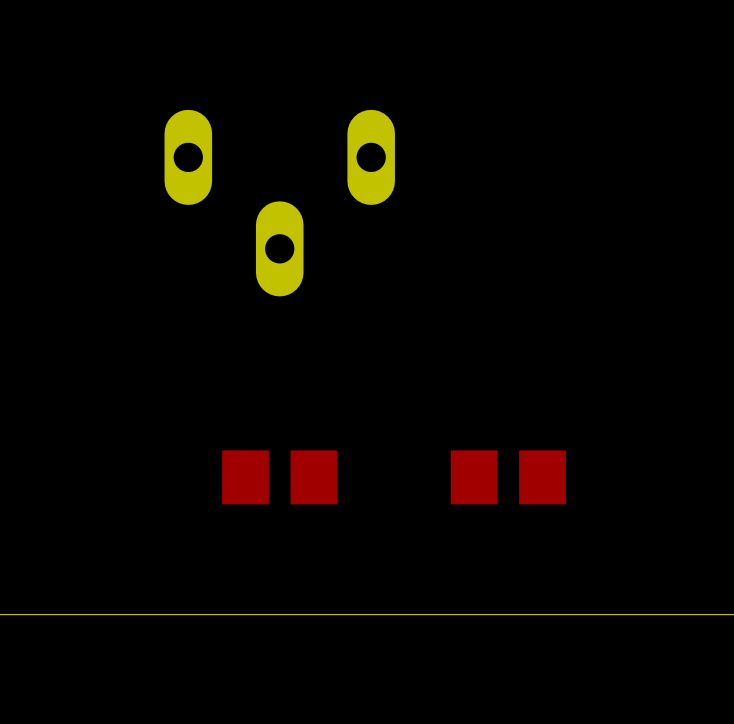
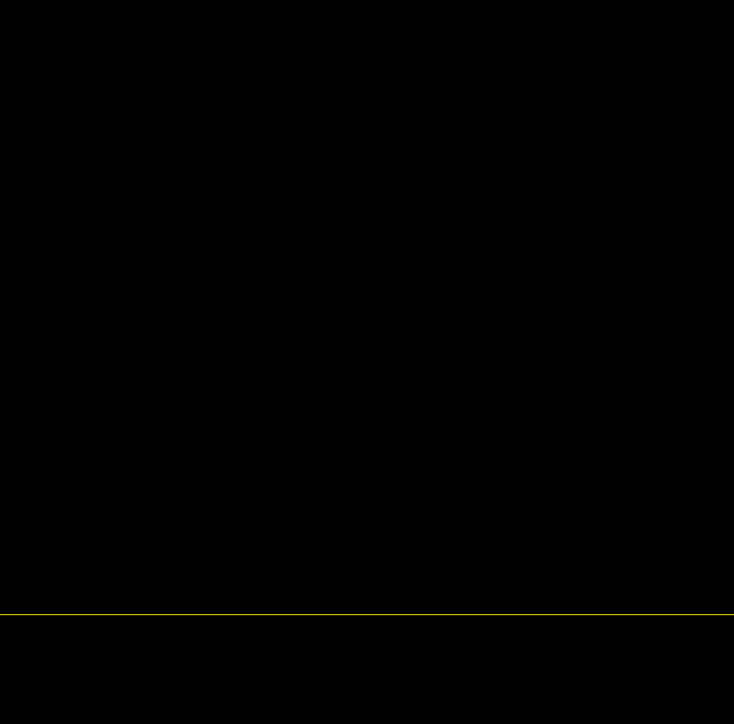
part: (279, 203) -> none
part: (279, 477) -> none
part: (508, 477) -> none

